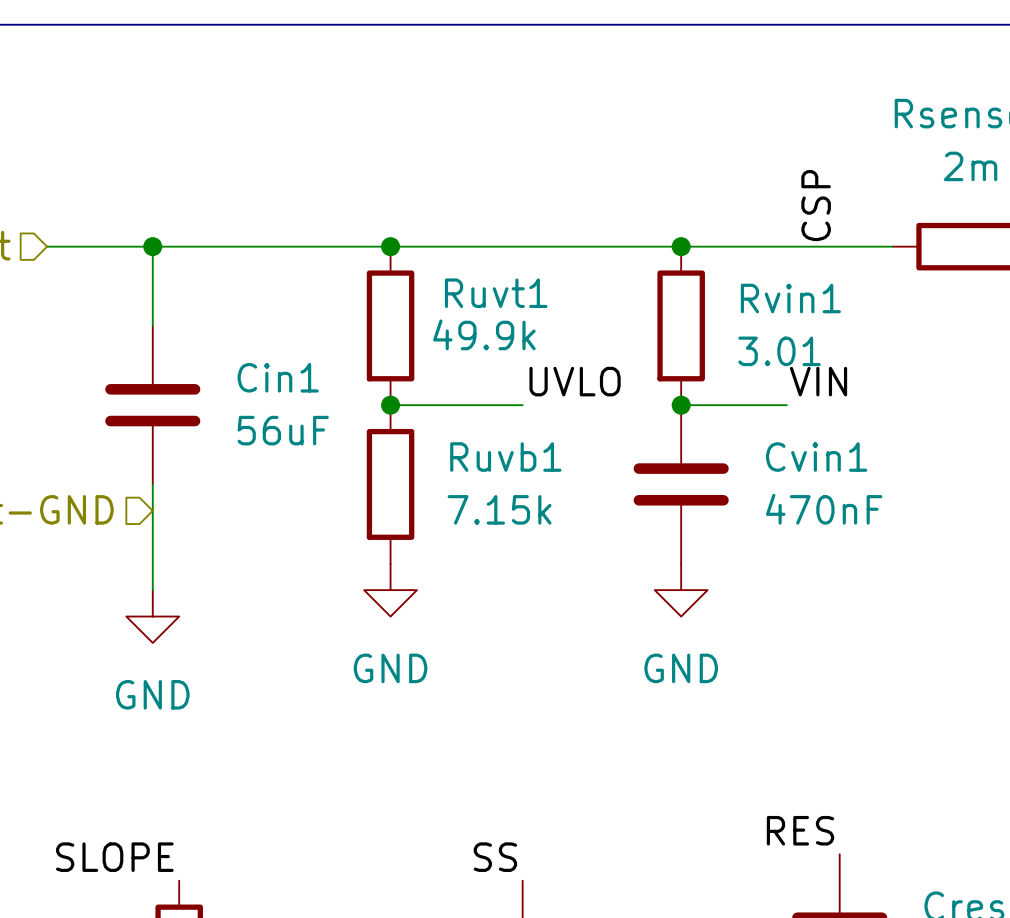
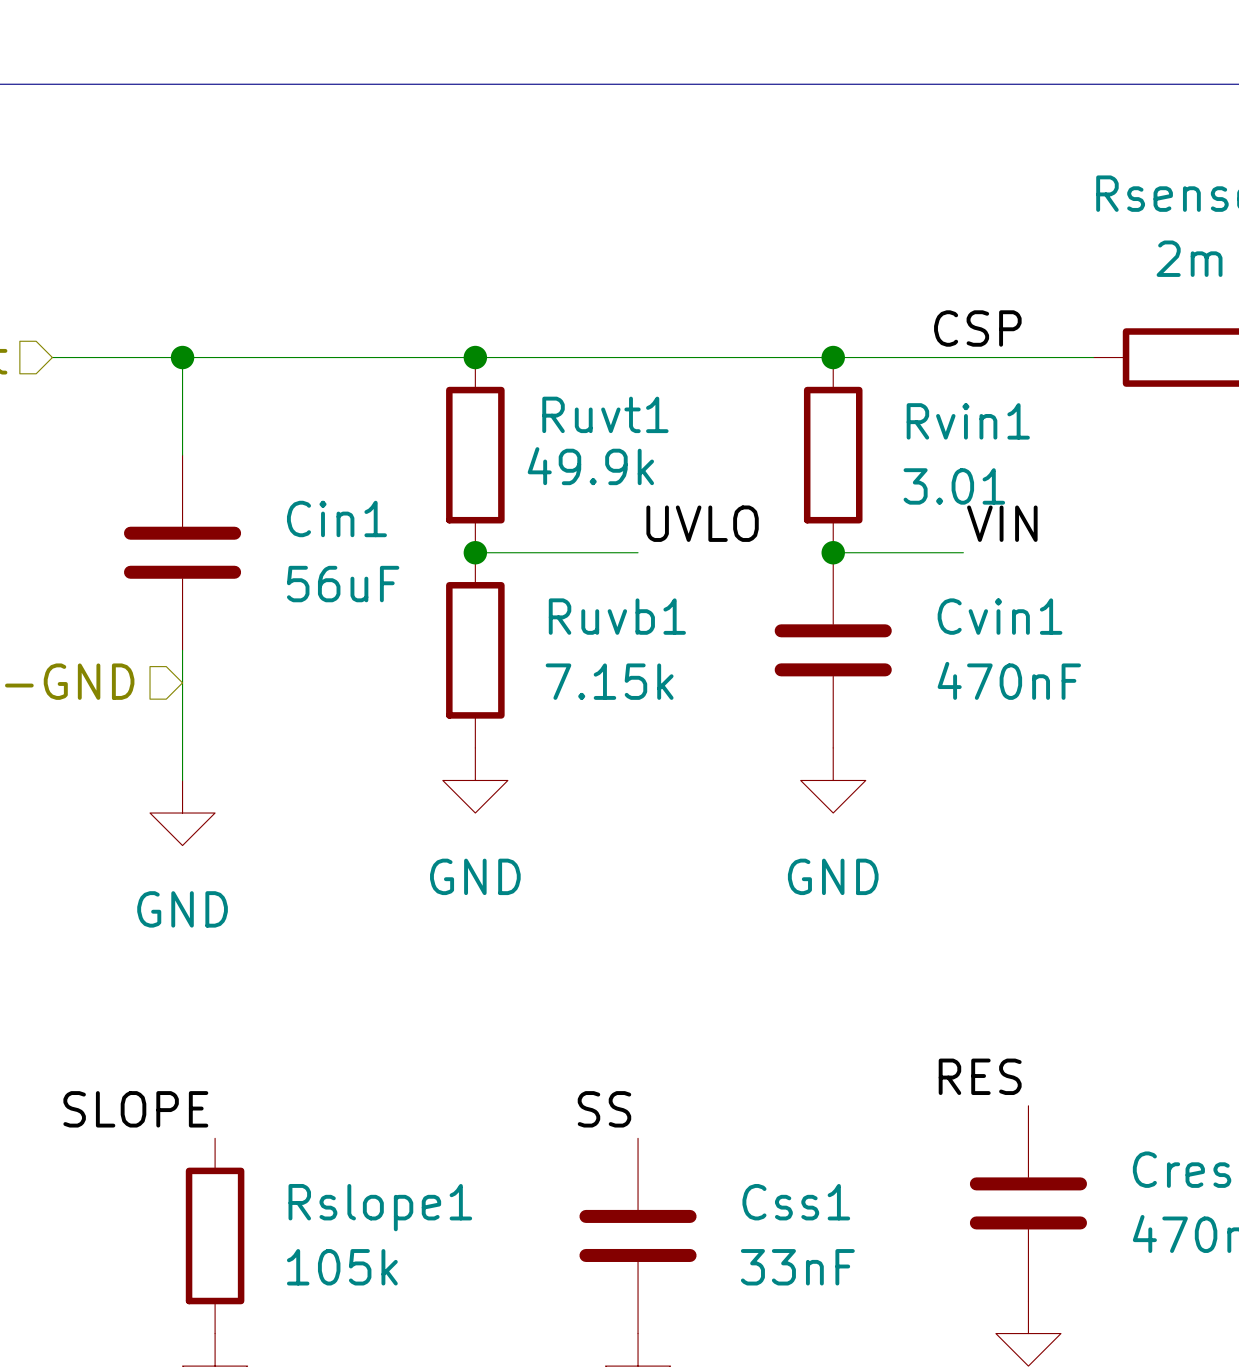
label rotation: 0° (816, 205) -> 90° clockwise (977, 328)

